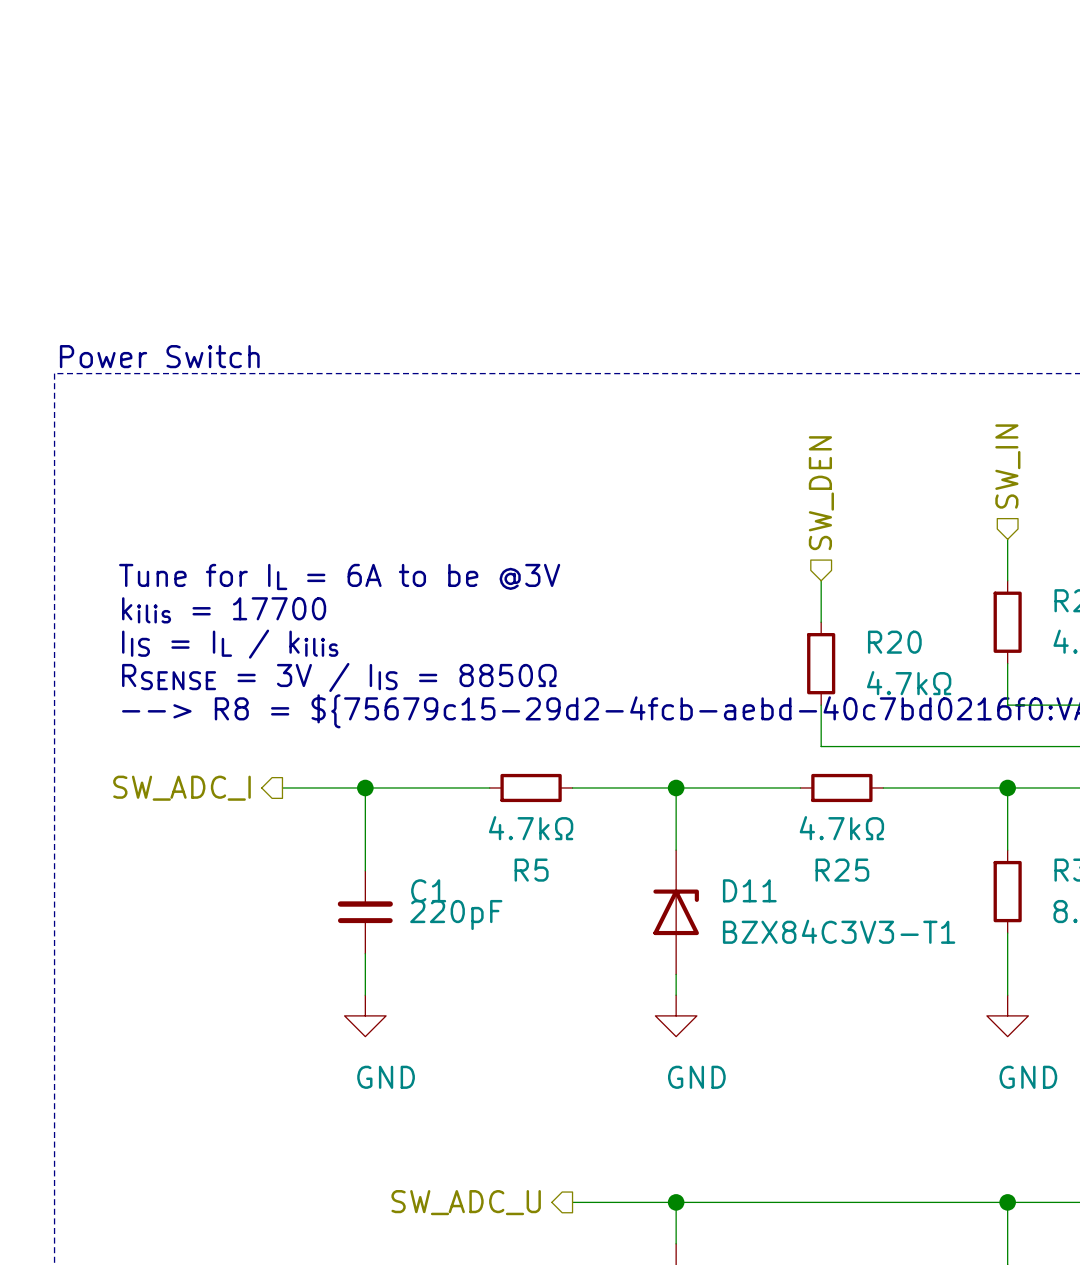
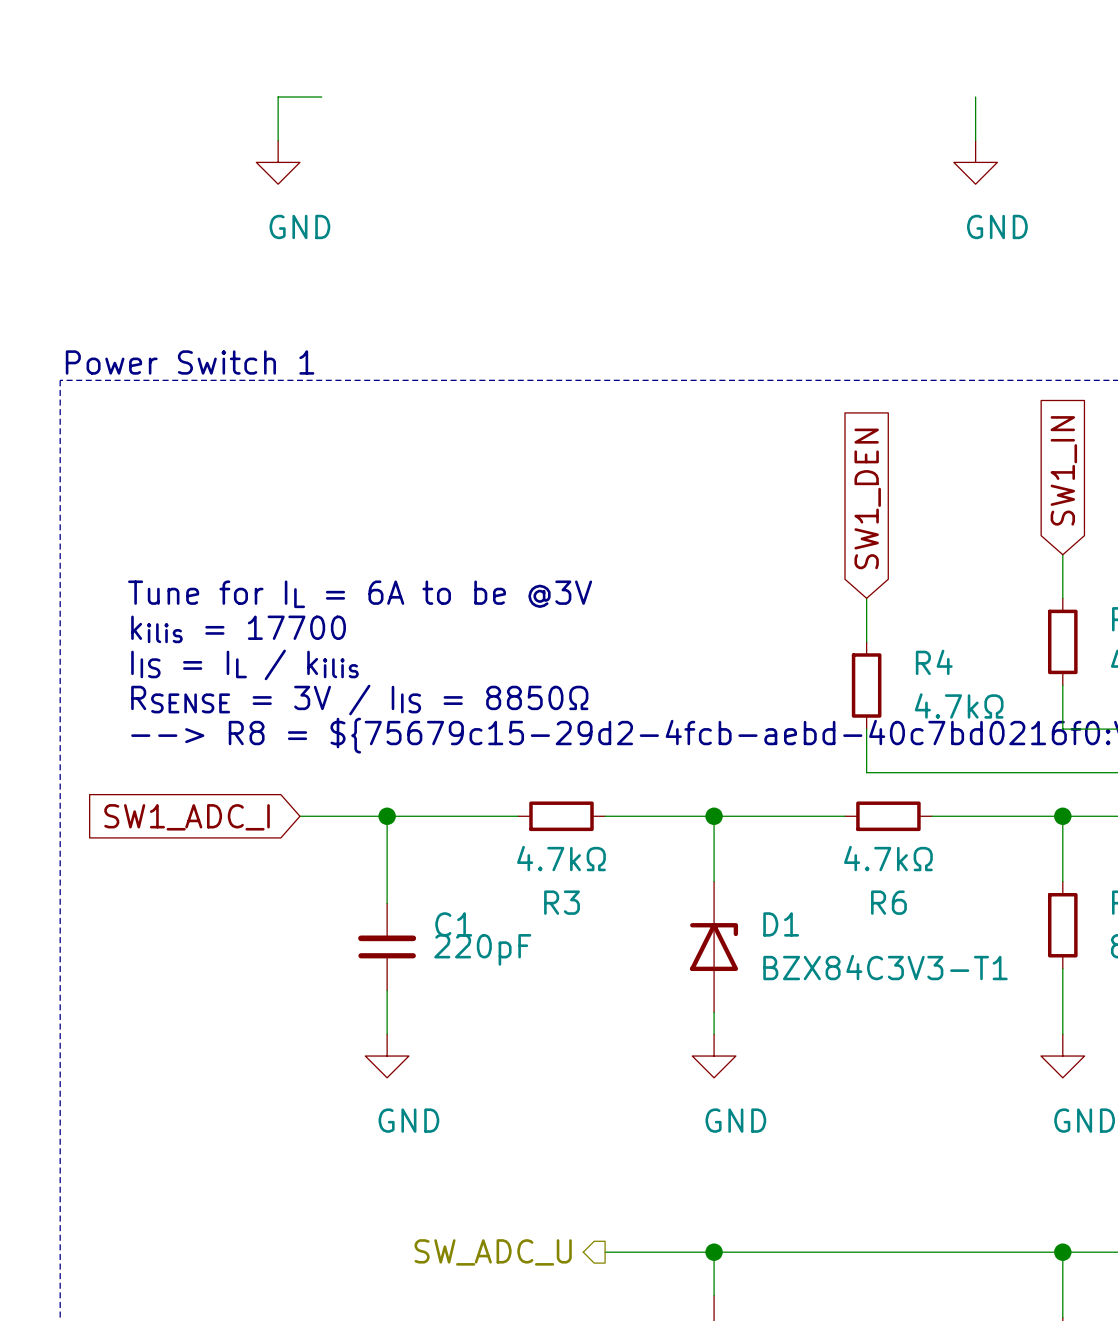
wire: none -> (321, 97) (278, 97) (278, 140)
wire: none -> (975, 97) (975, 140)
power symbol: none -> GND (278, 162)
power symbol: none -> GND (975, 162)
text: Power Switch (159, 356) -> Power Switch 1 (190, 362)
global label: none -> SW1_IN (1063, 470)
hierarchical label: SW_IN (1007, 466) -> none
global label: none -> SW1_DEN (867, 498)
hierarchical label: SW_DEN (821, 493) -> none
R20 name: R20 (894, 642) -> R4 (934, 662)
global label: none -> SW1_ADC_I (187, 817)
hierarchical label: SW_ADC_I (181, 788) -> none
R5 name: R5 (531, 870) -> R3 (562, 902)
R25 name: R25 (842, 870) -> R6 (888, 902)
D11 name: D11 (749, 890) -> D1 (781, 924)

